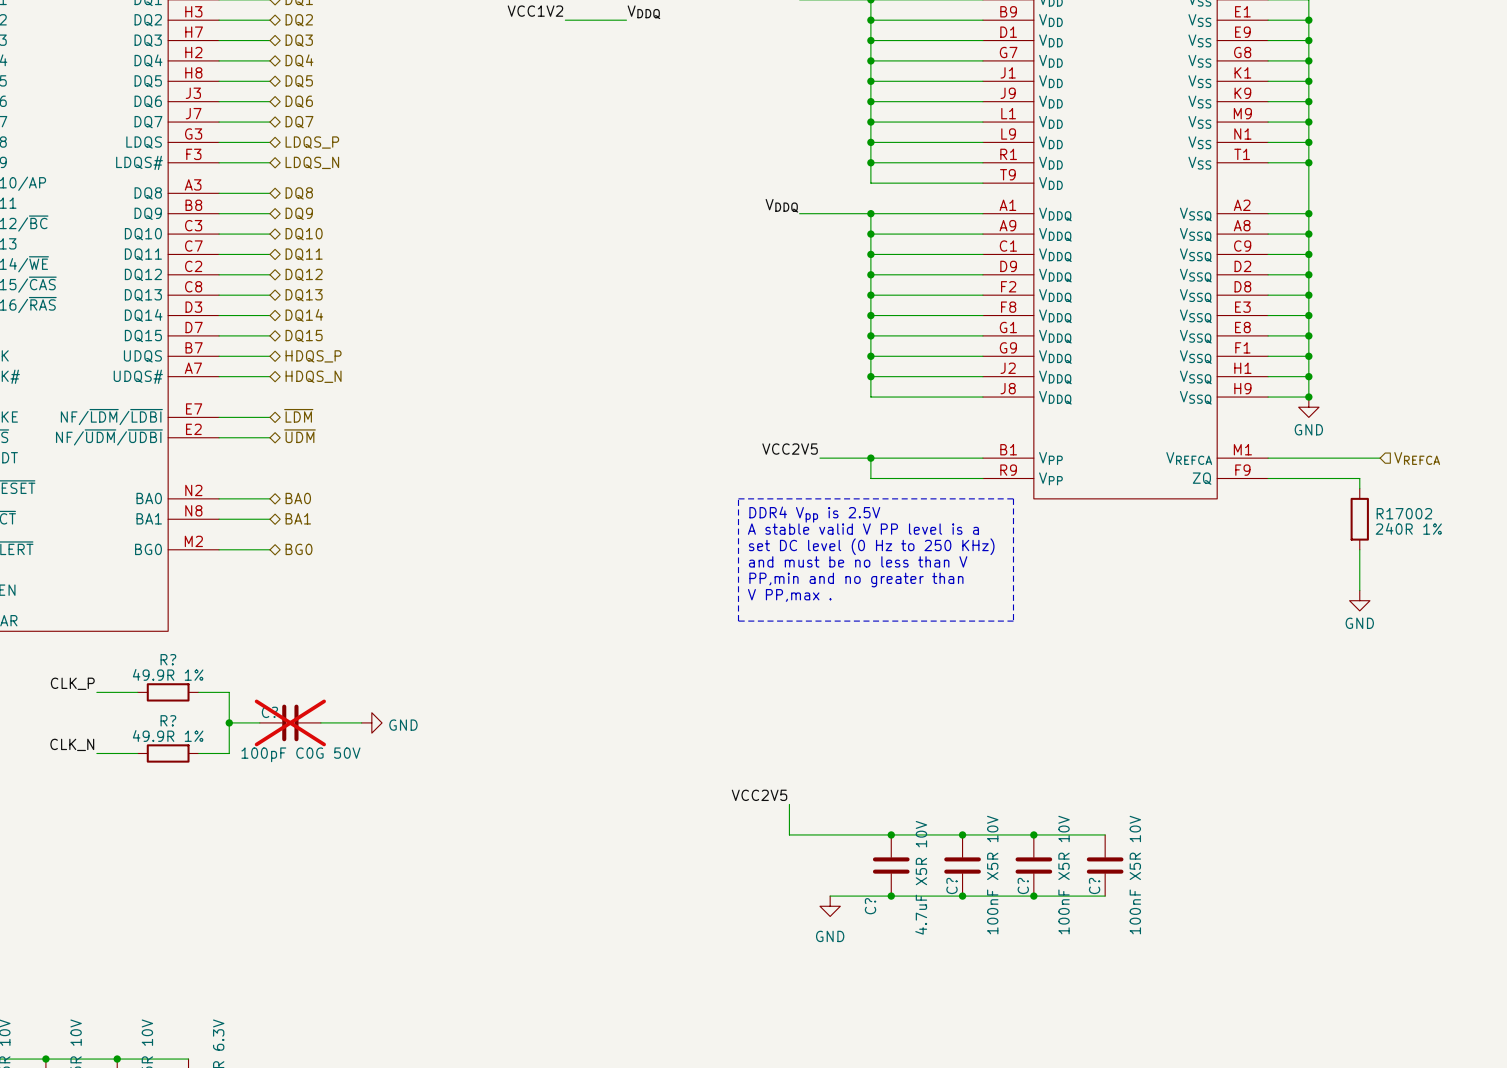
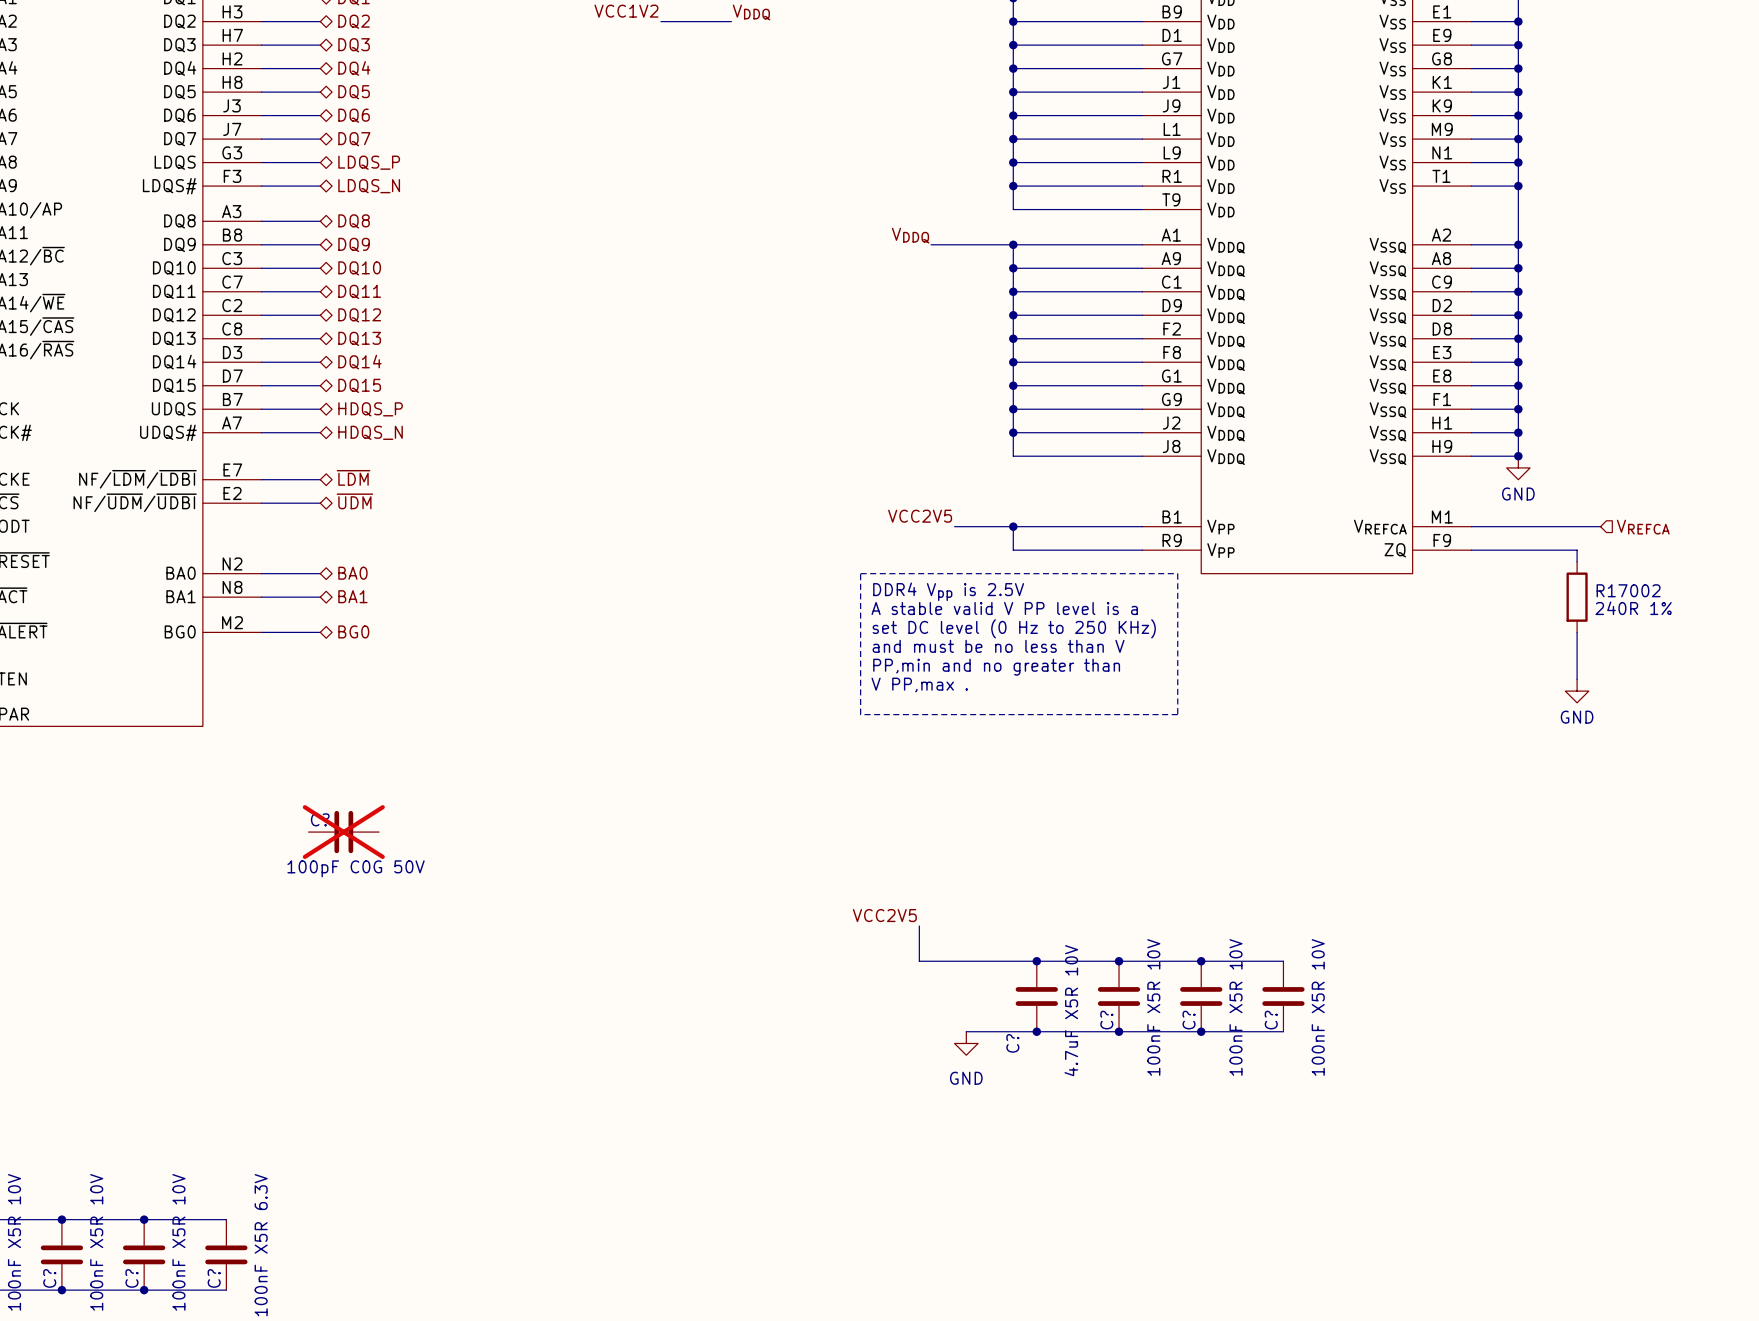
label: CLK_P (72, 683) -> none
wire: (96, 692) (137, 692) -> none
R?: 49.9R 1% (168, 692) -> none
wire: (198, 692) (229, 692) (229, 753) (198, 753) -> none
wire: (229, 722) (259, 722) -> none
junction: (229, 722) -> none
wire: (320, 722) (361, 722) -> none
power symbol: GND (371, 722) -> none
label: CLK_N (72, 744) -> none
wire: (96, 753) (137, 753) -> none
R?: 49.9R 1% (168, 753) -> none

